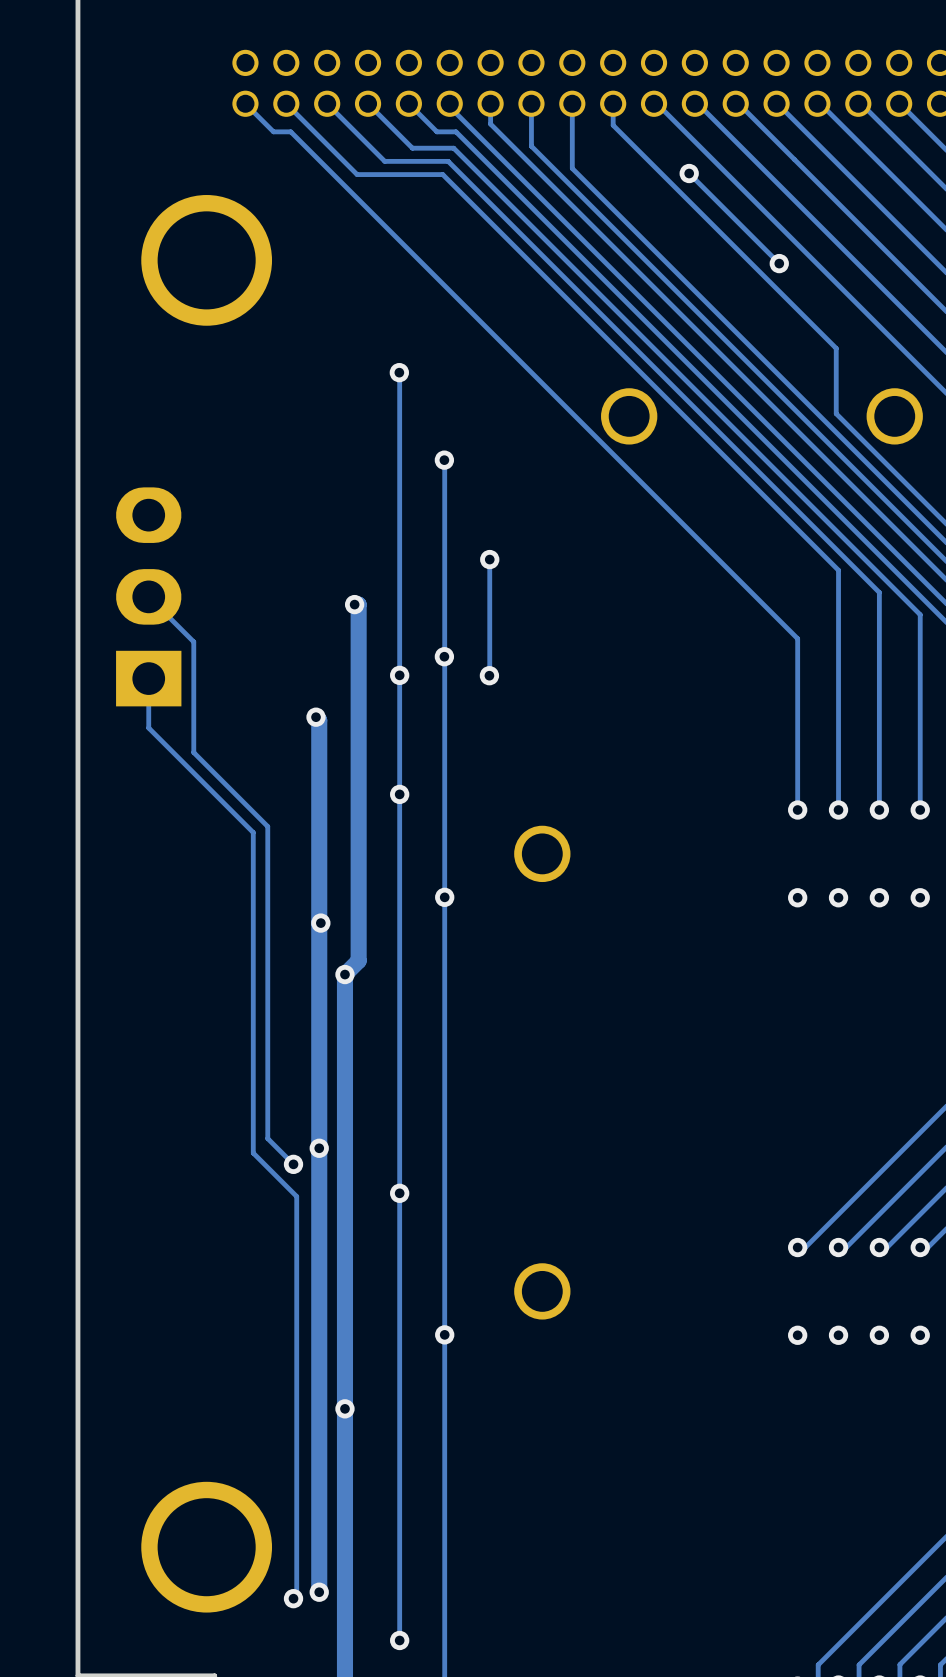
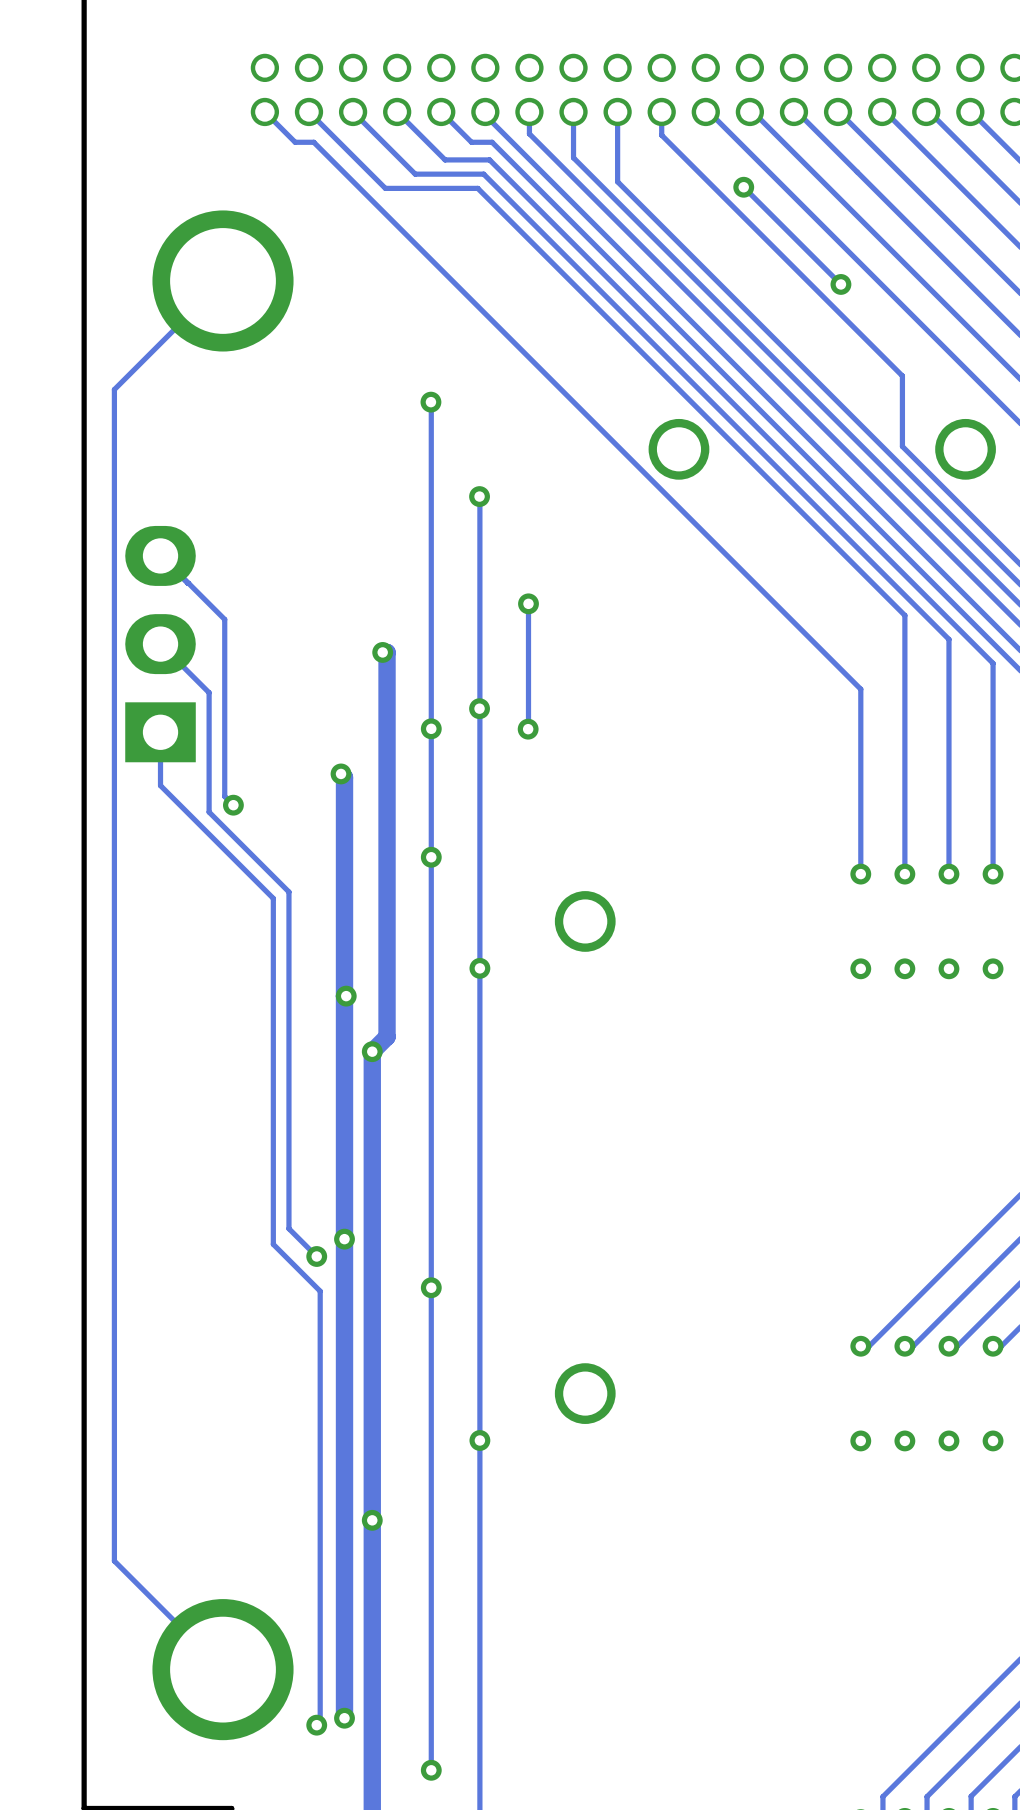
track: none -> (223, 280) (114, 389) (114, 1561) (223, 1669)
track: none -> (160, 555) (224, 619) (224, 796) (233, 805)
via: none -> (233, 805)

